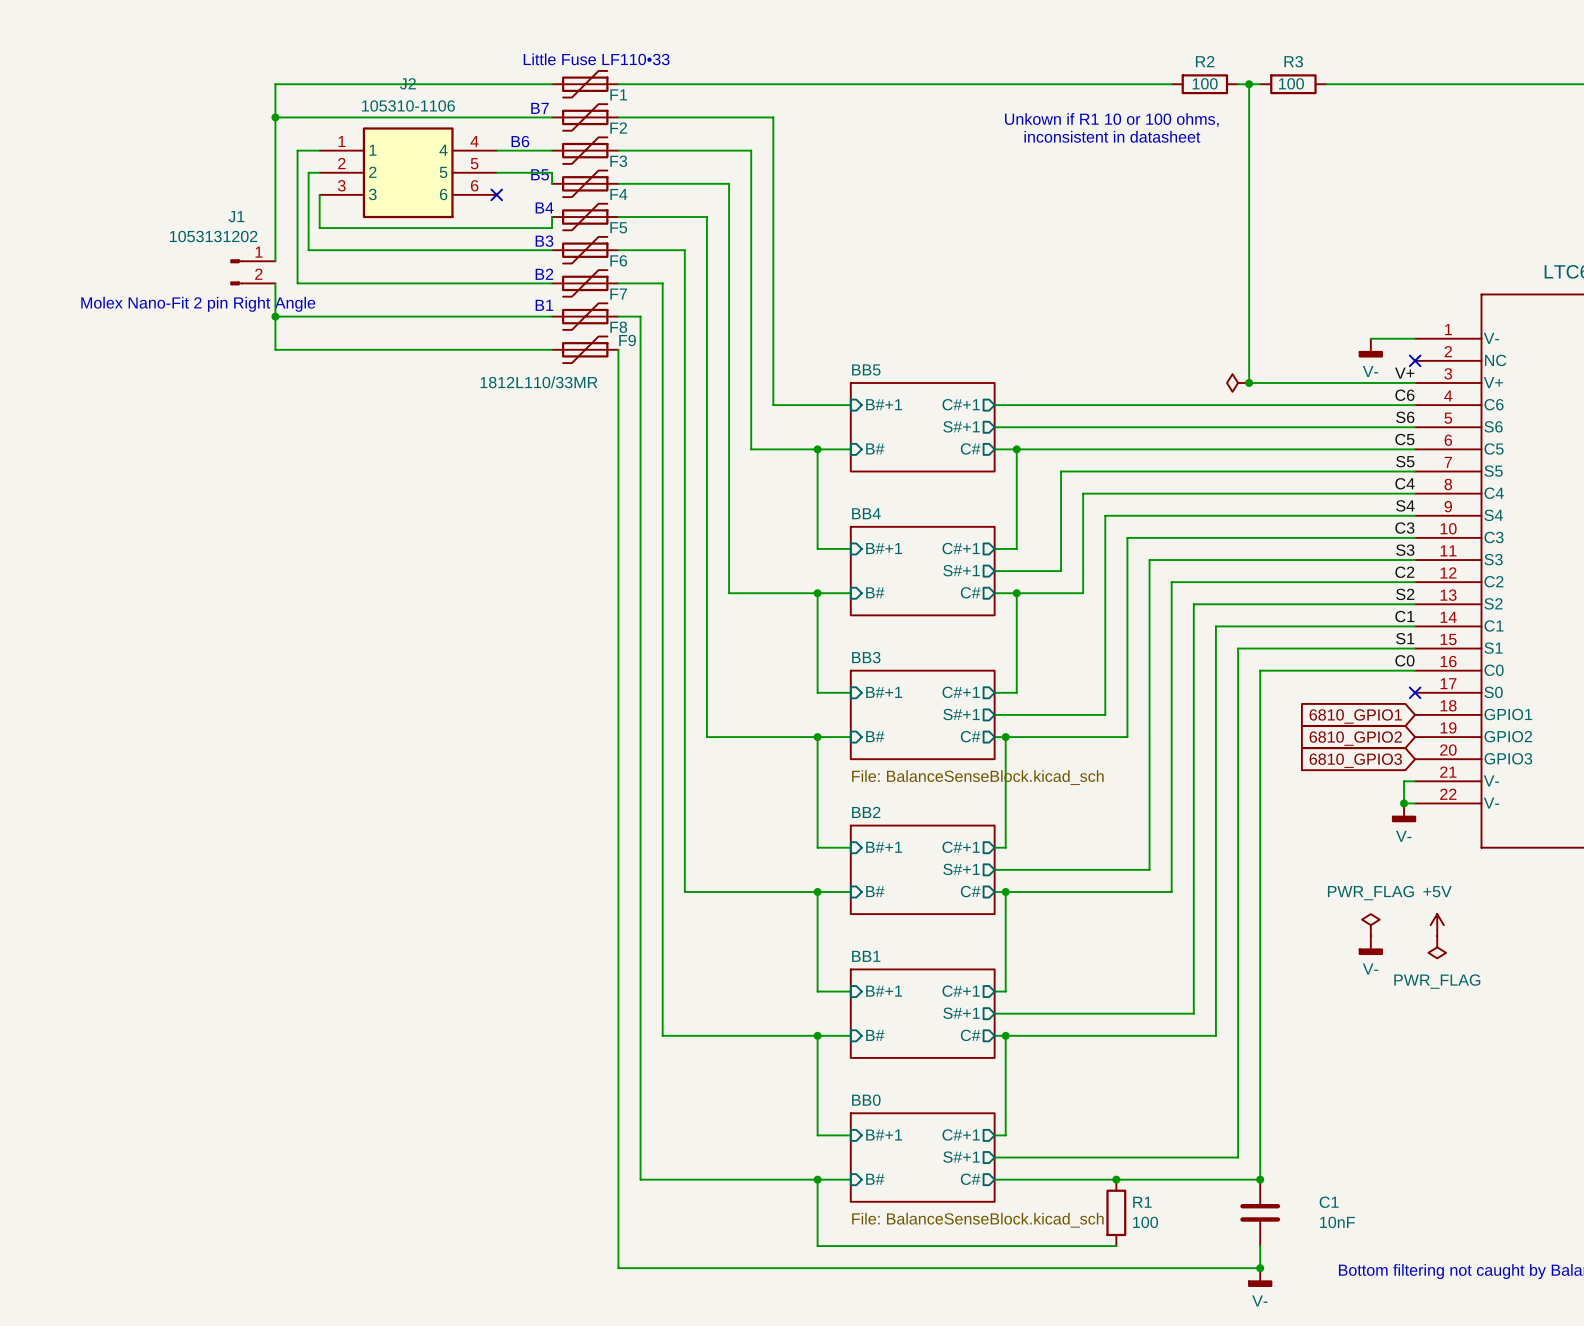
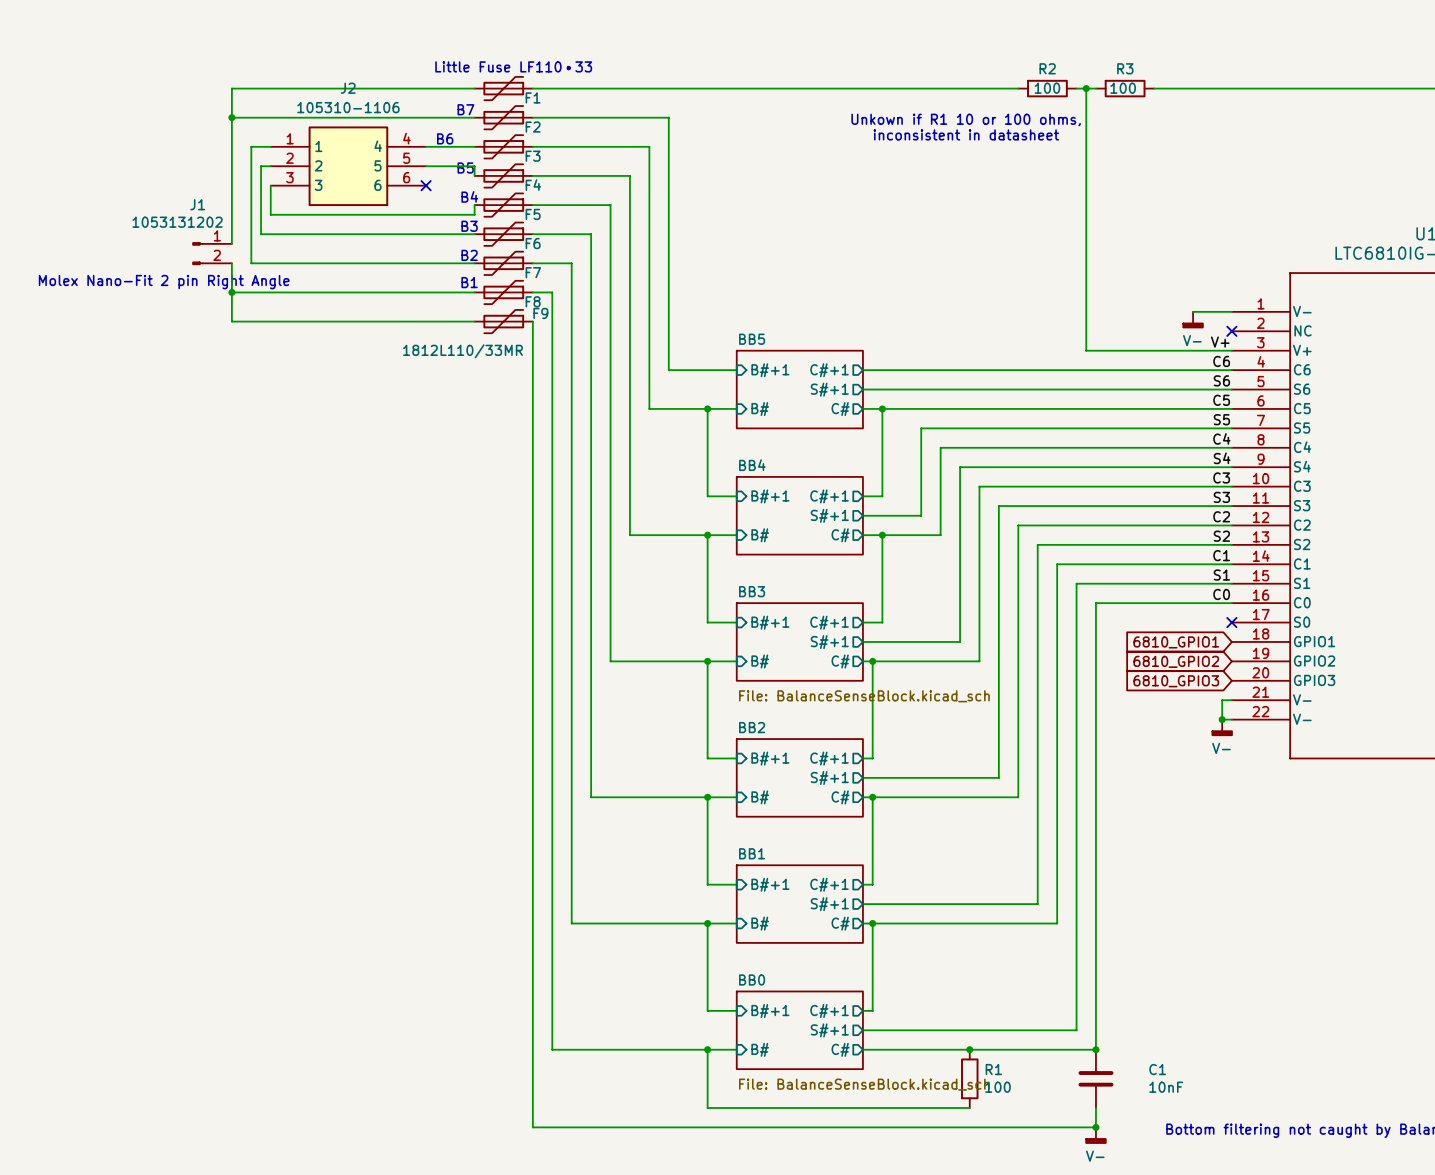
power symbol: (1238, 382) -> none
junction: (1249, 382) -> none
power symbol: PWR_FLAG (1370, 925) -> none
power symbol: +5V (1437, 925) -> none
power symbol: V- (1370, 945) -> none
power symbol: PWR_FLAG (1437, 947) -> none

